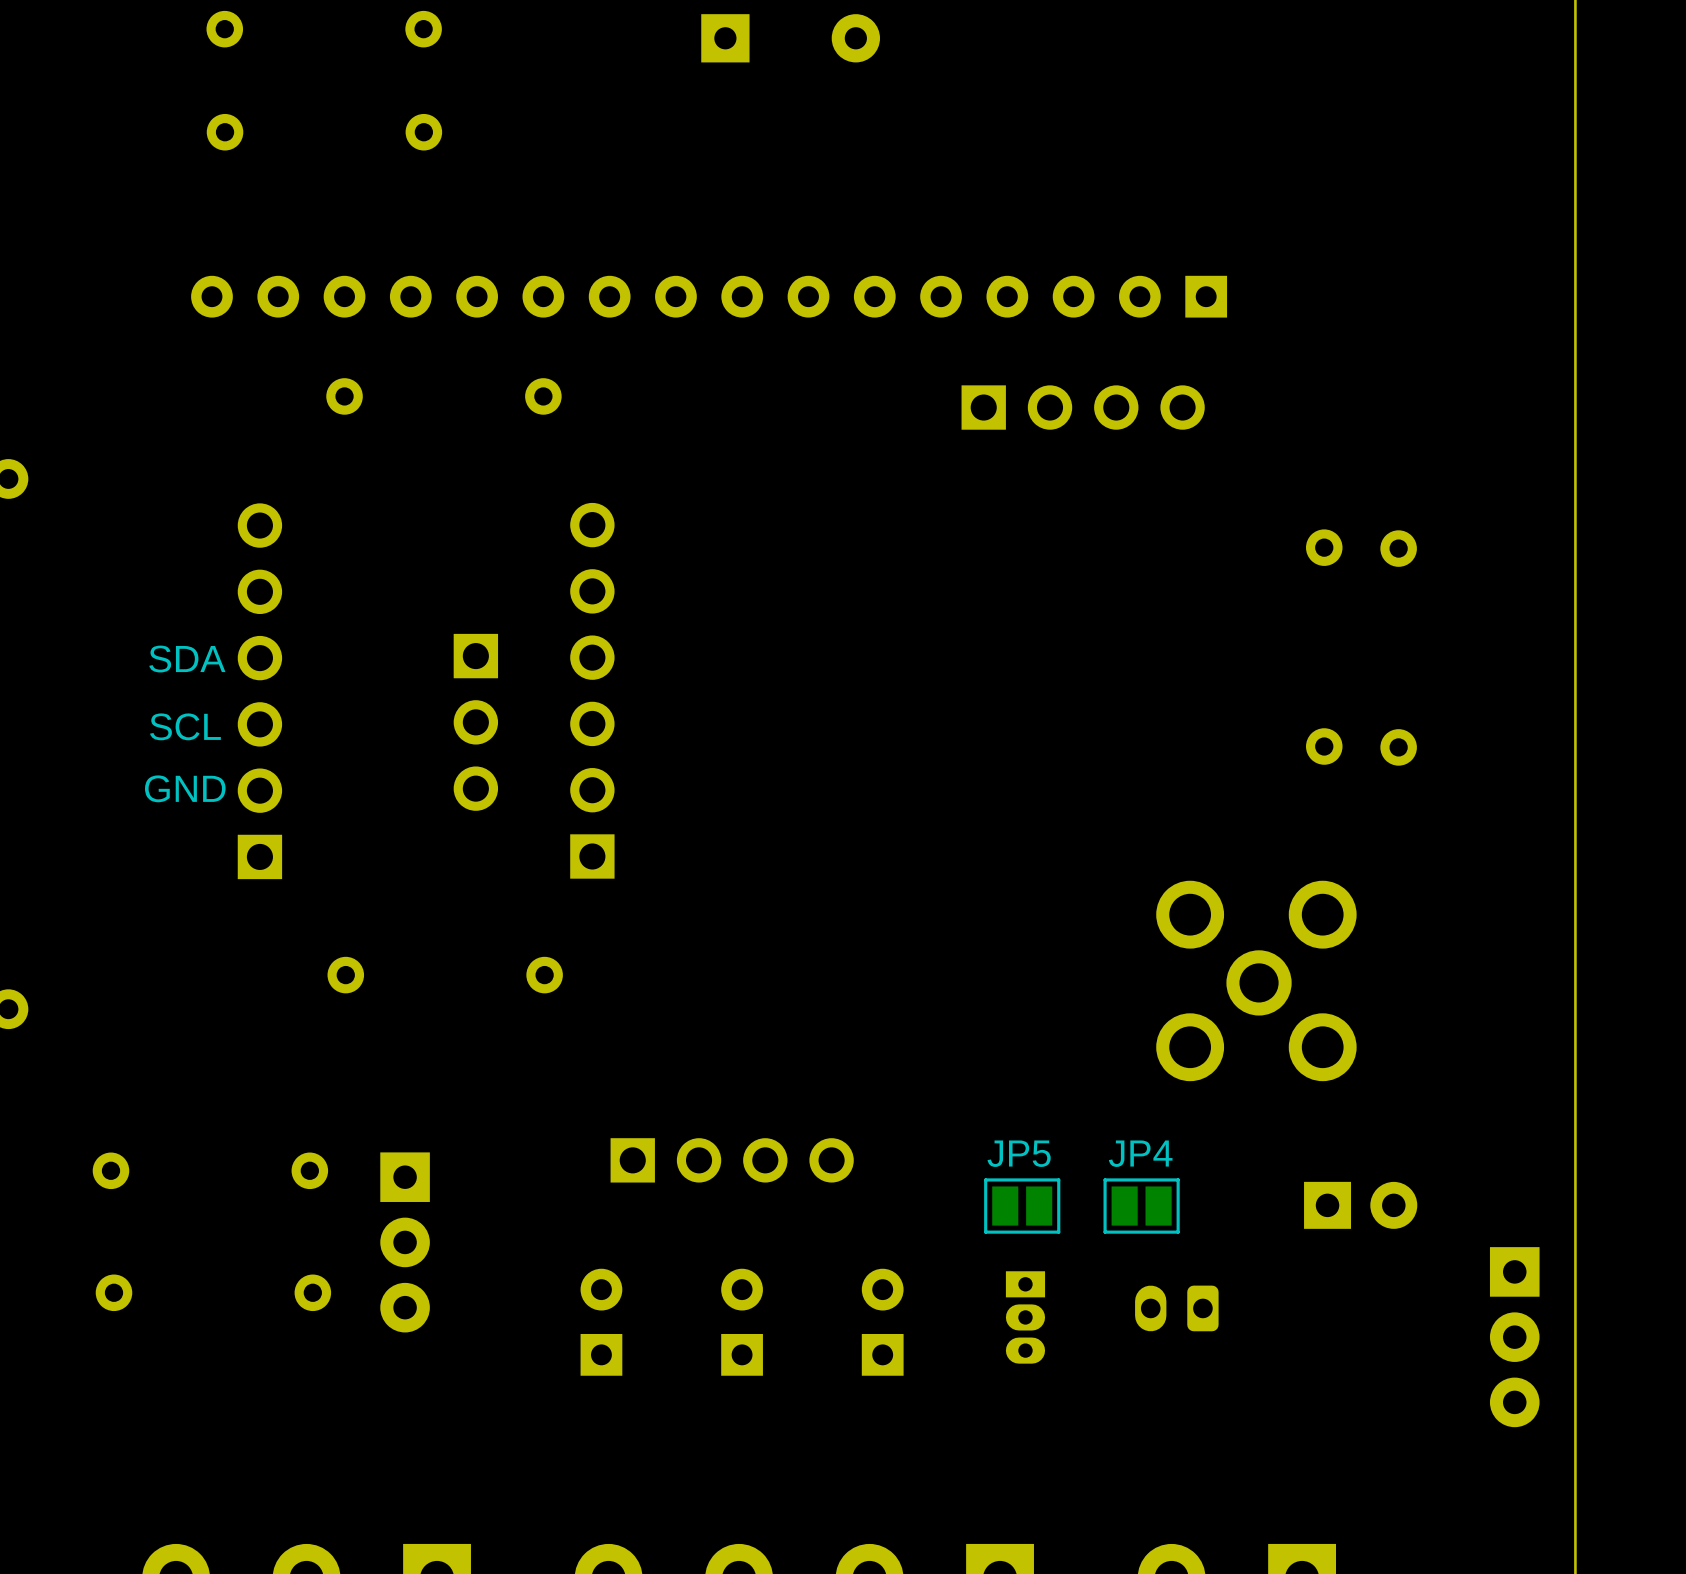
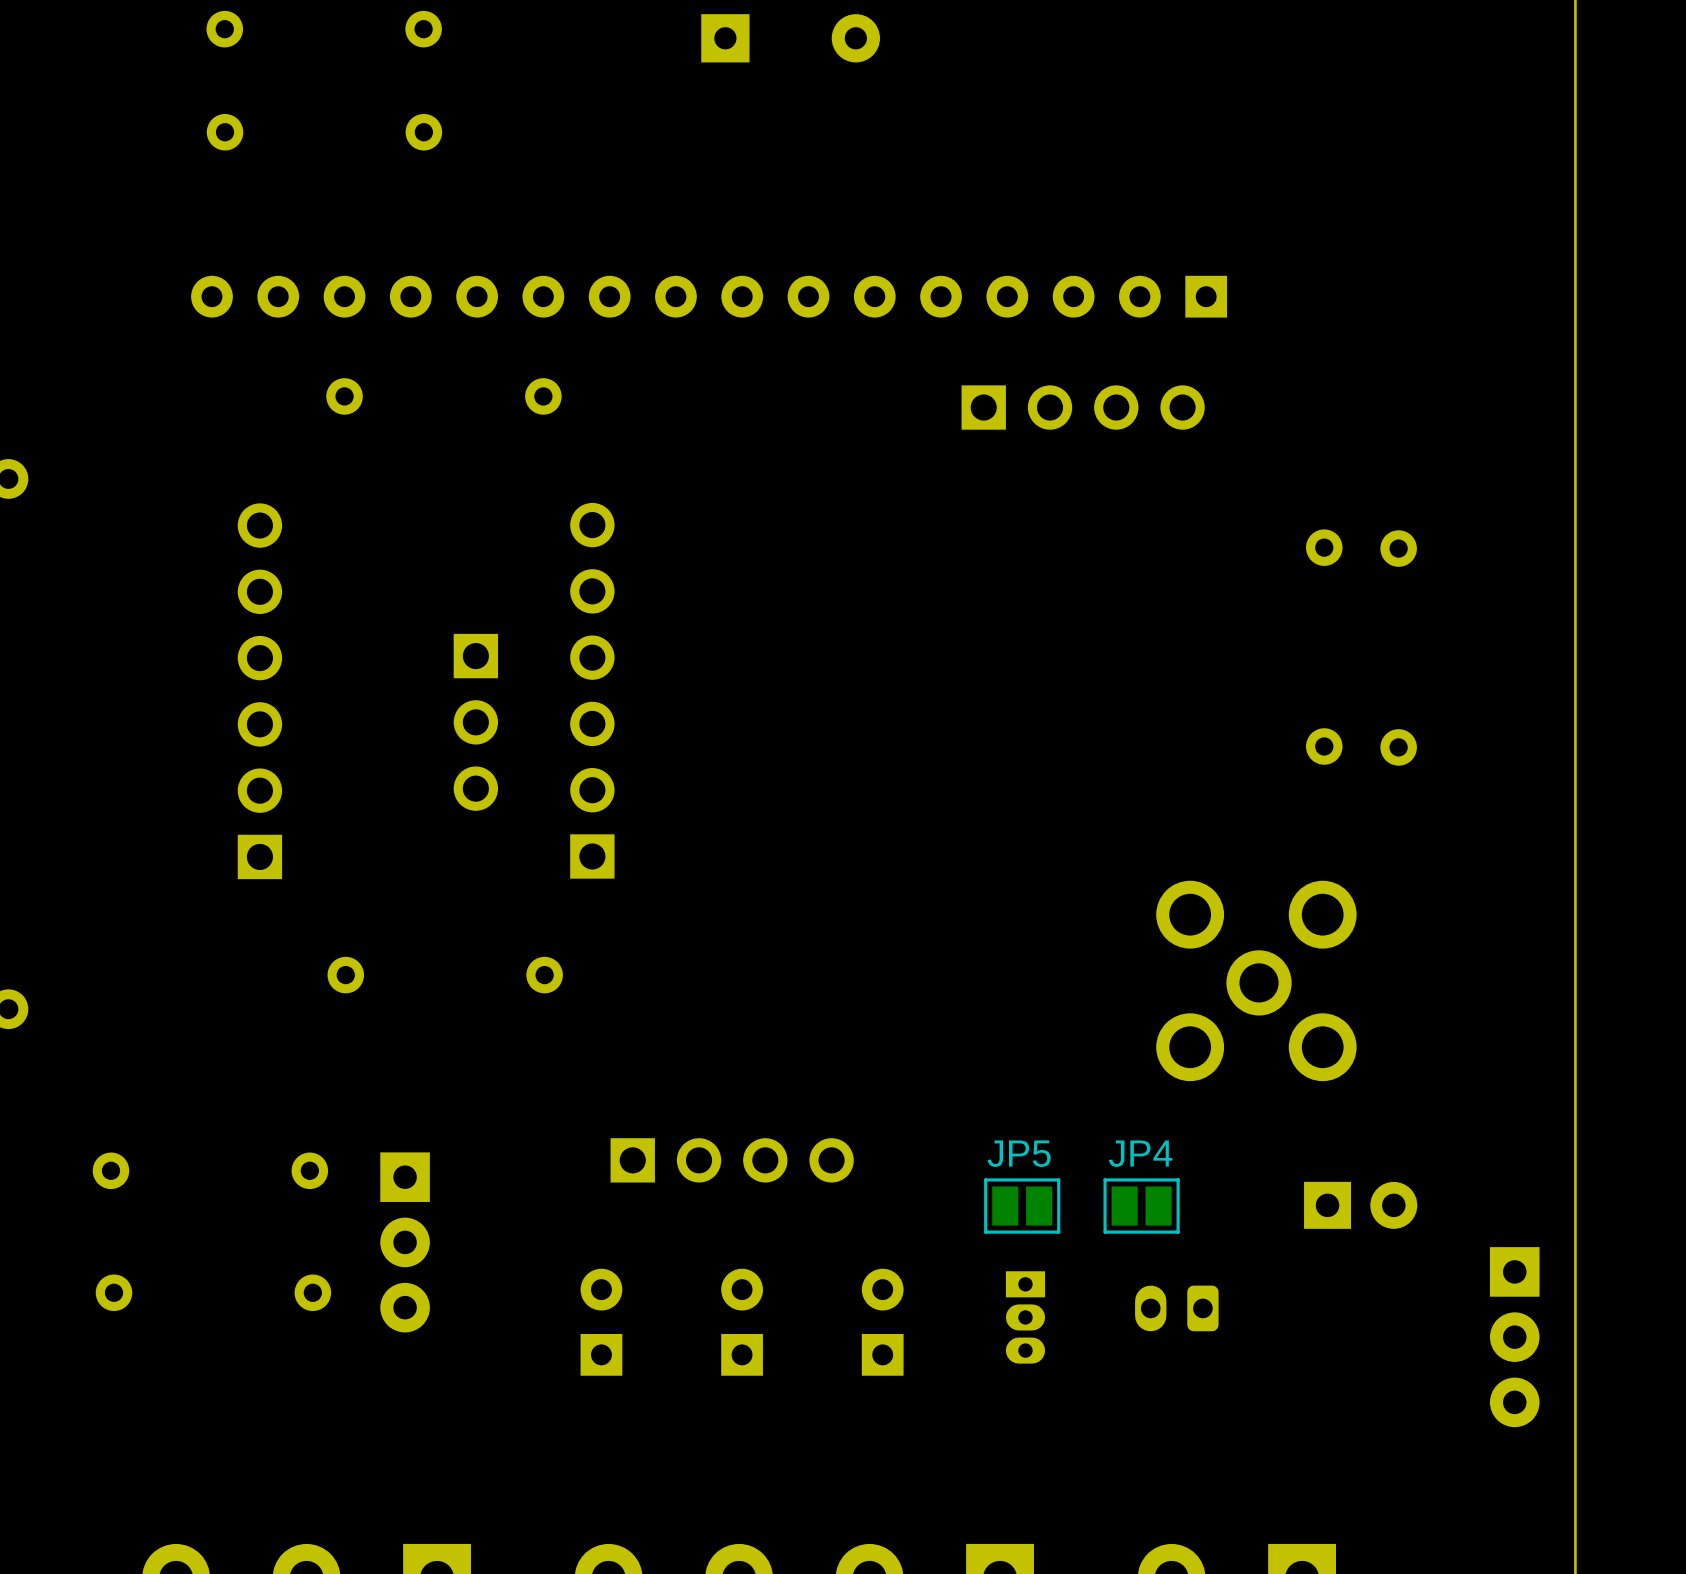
text: SDA (187, 659) -> none
text: SCL (185, 726) -> none
text: GND (185, 788) -> none

